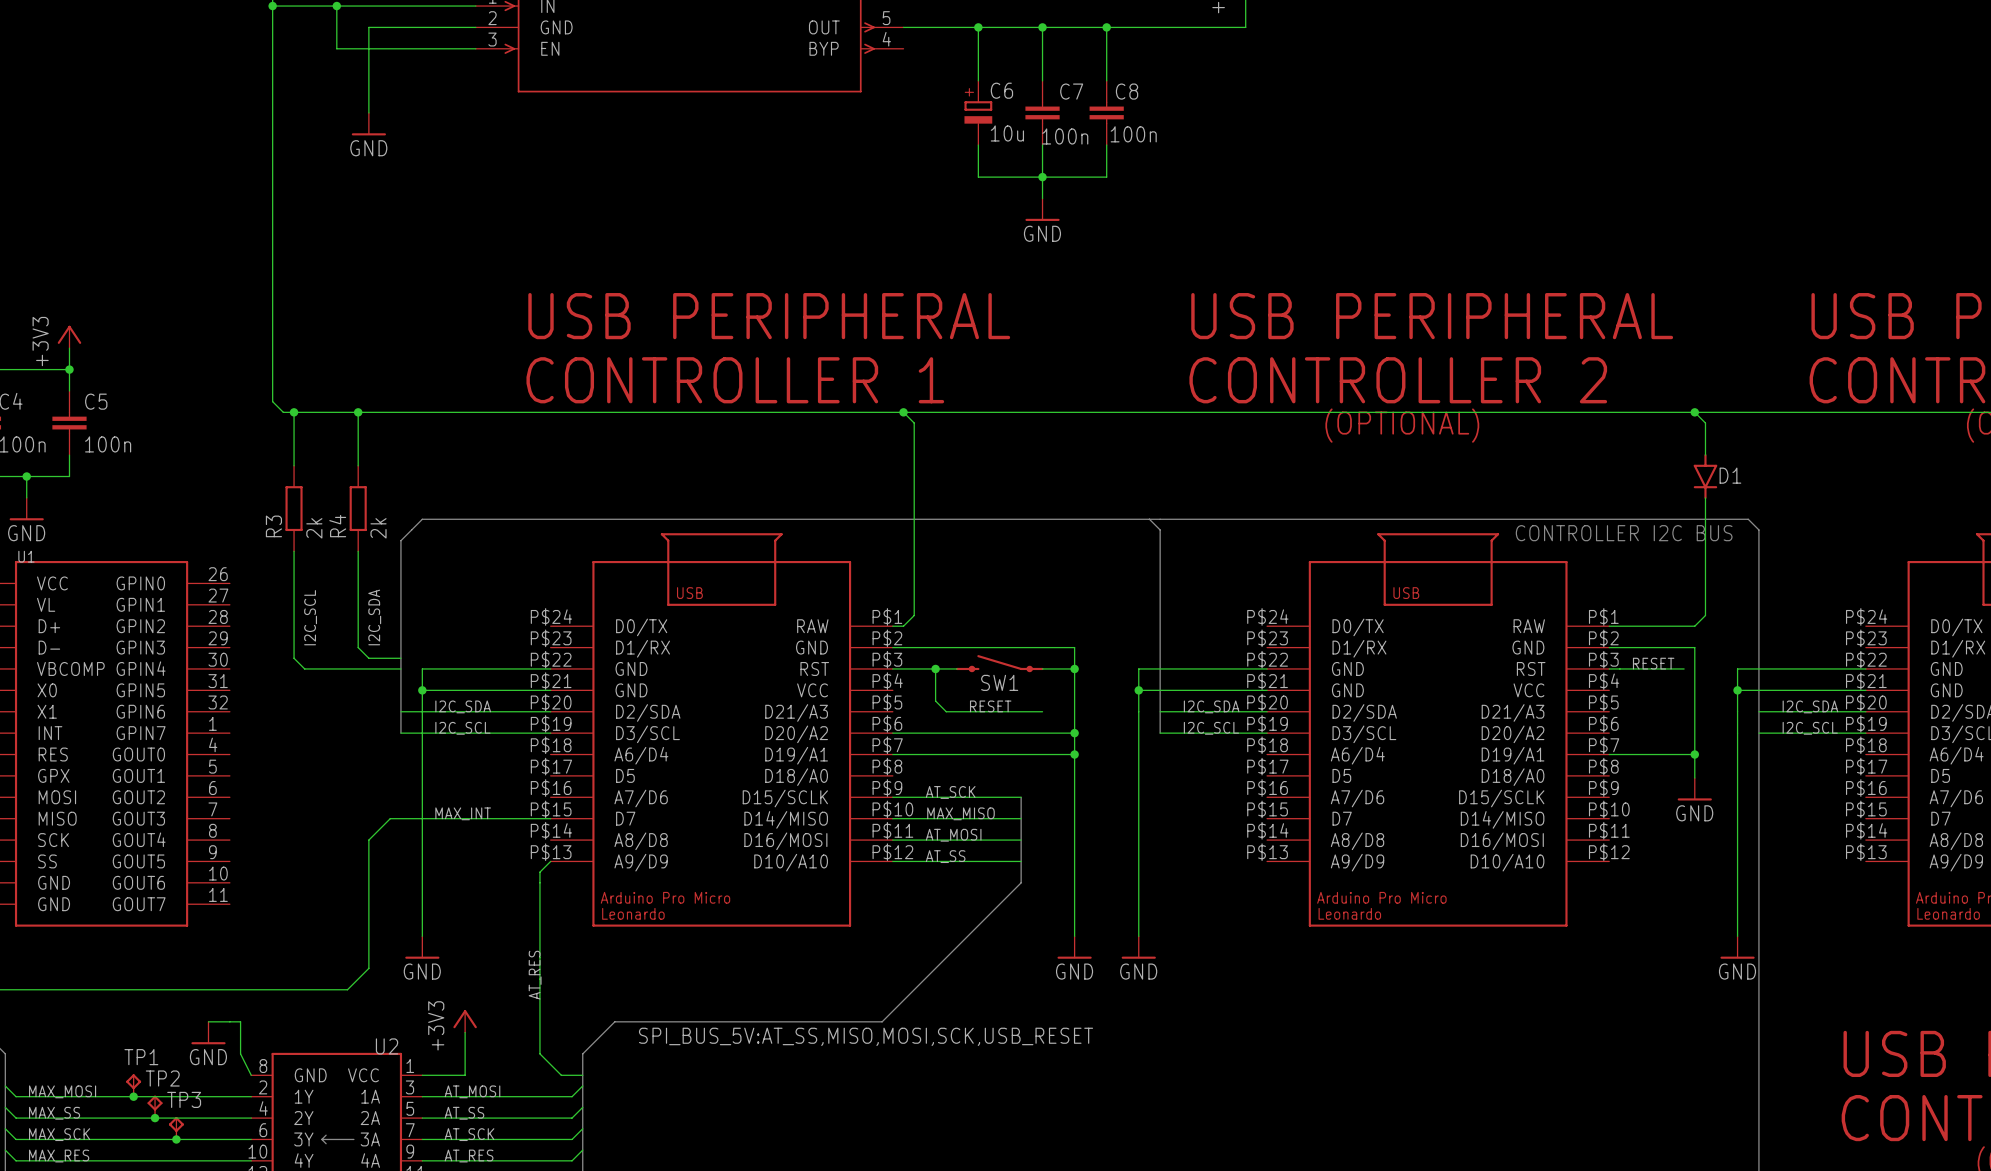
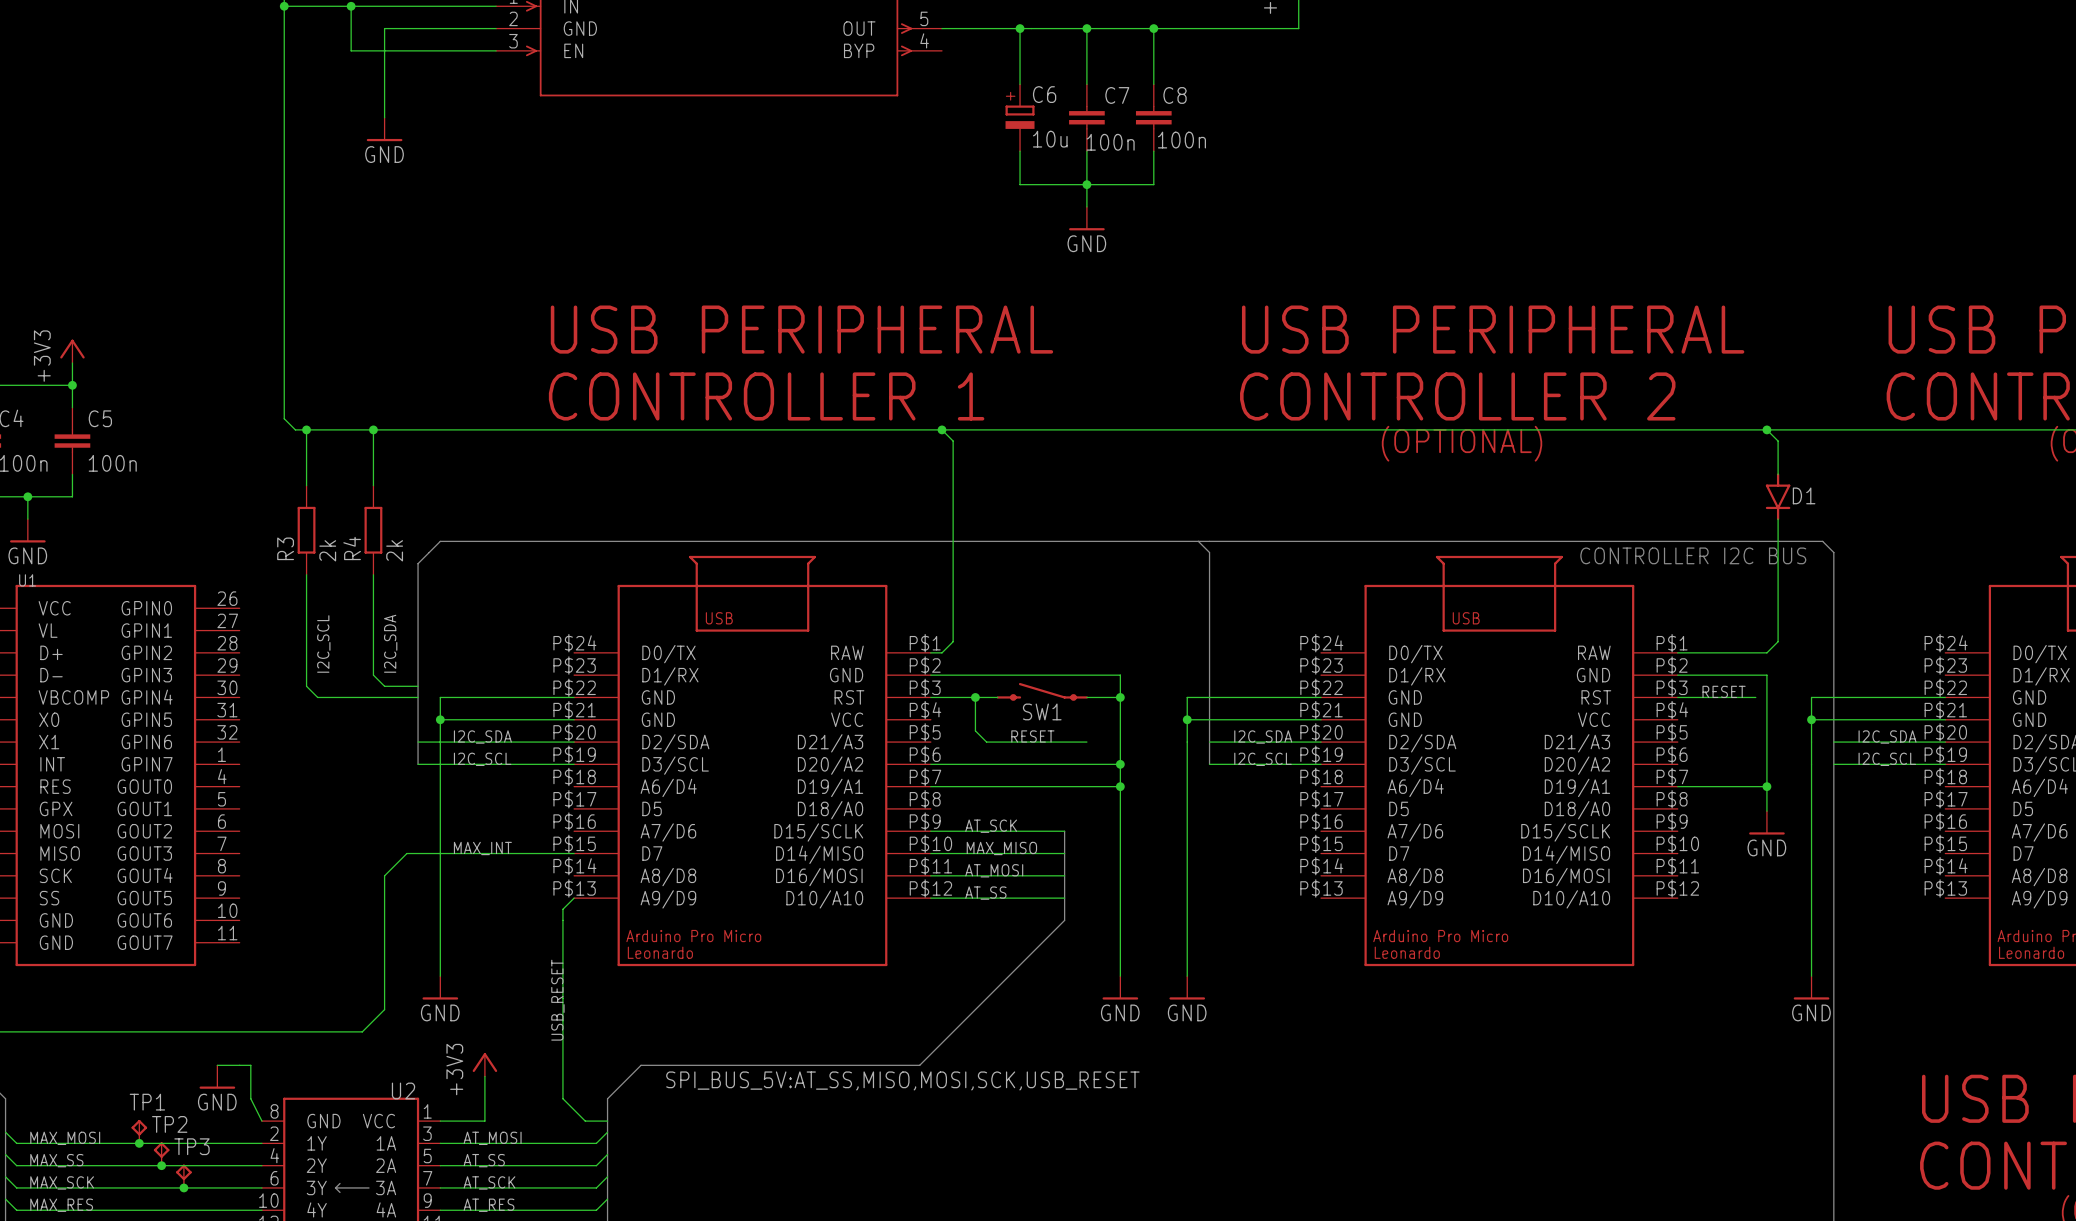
label: AT_RES (535, 975) -> USB_RESET (557, 1000)

